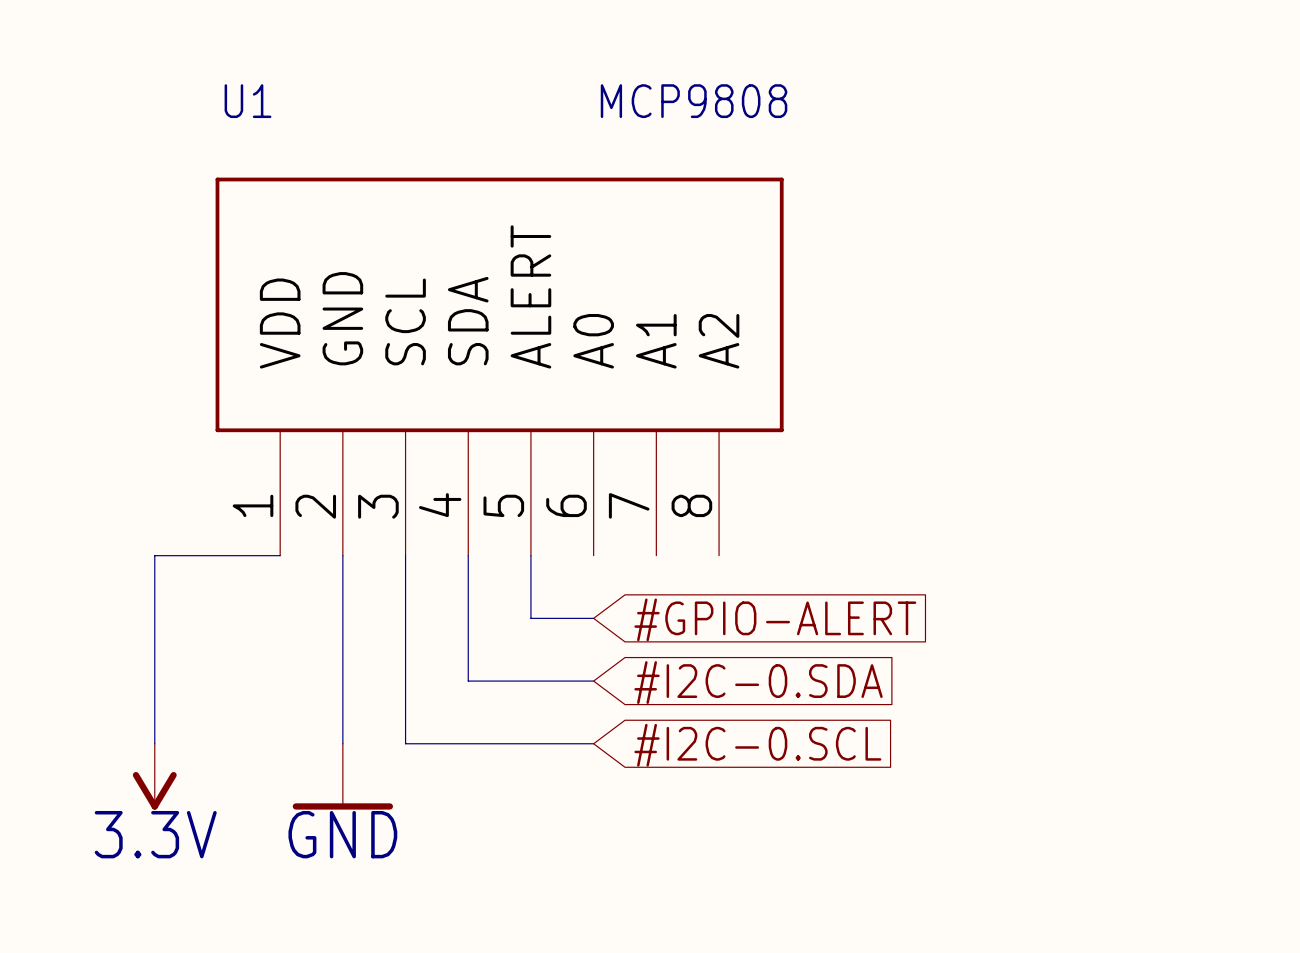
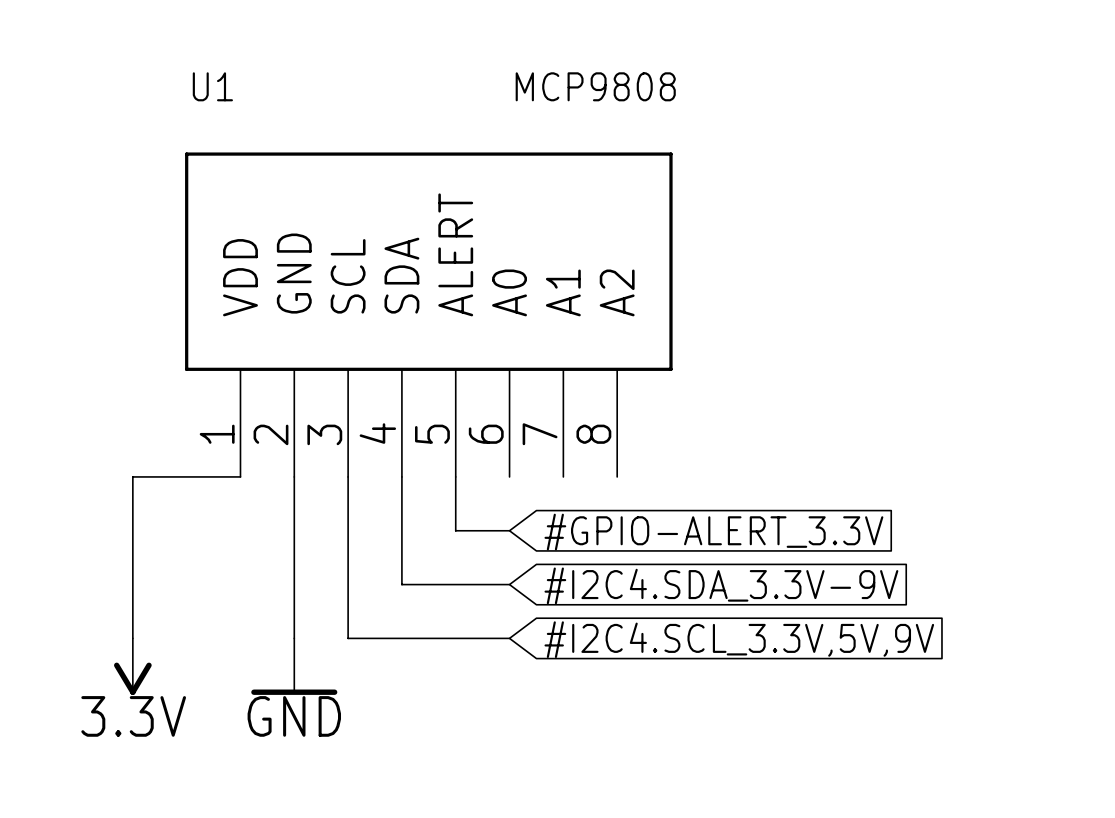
global label: #GPIO-ALERT (775, 619) -> #GPIO-ALERT_3.3V (713, 532)
global label: #I2C-0.SDA (758, 682) -> #I2C4.SDA_3.3V-9V (721, 585)
global label: #I2C-0.SCL (757, 745) -> #I2C4.SCL_3.3V,5V,9V (739, 639)

